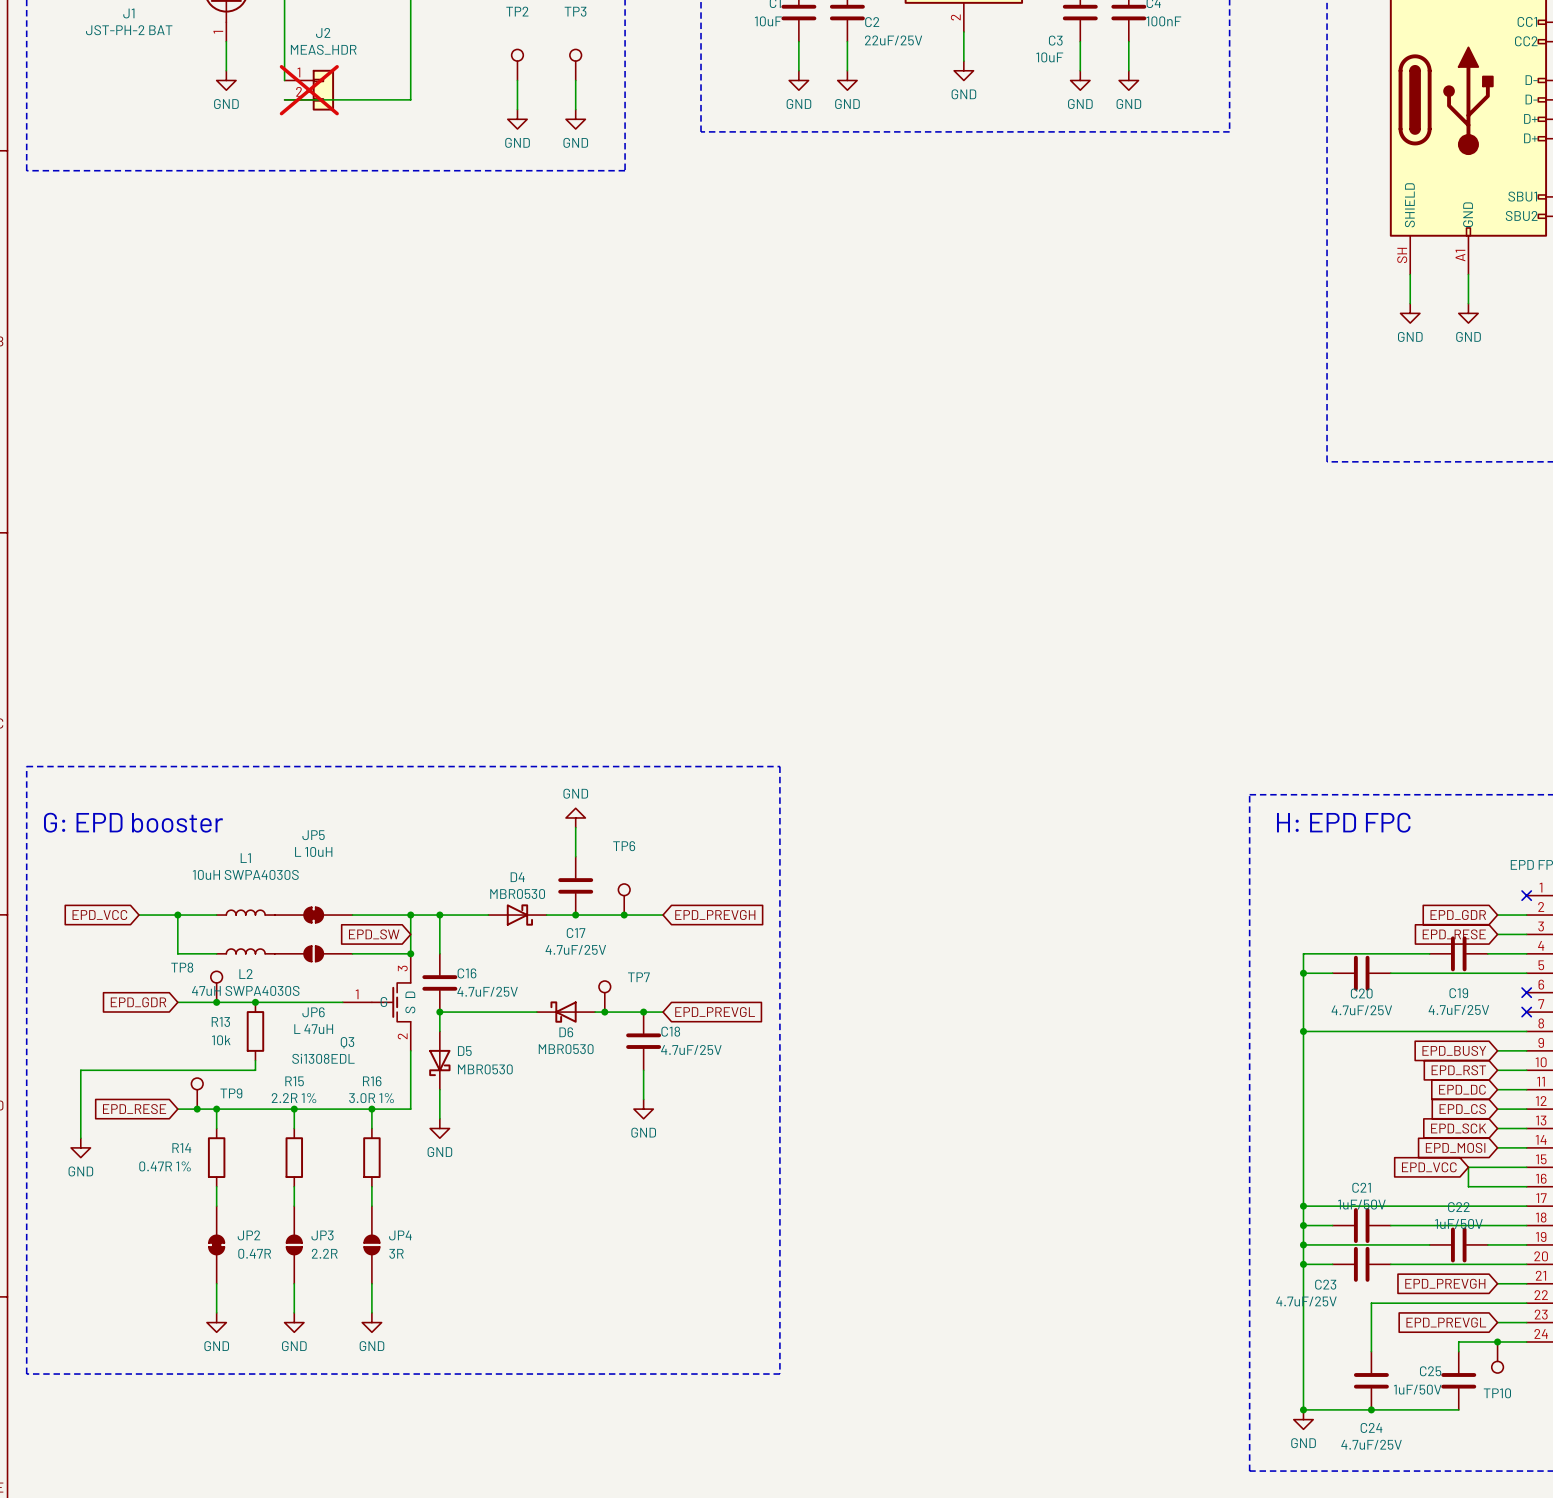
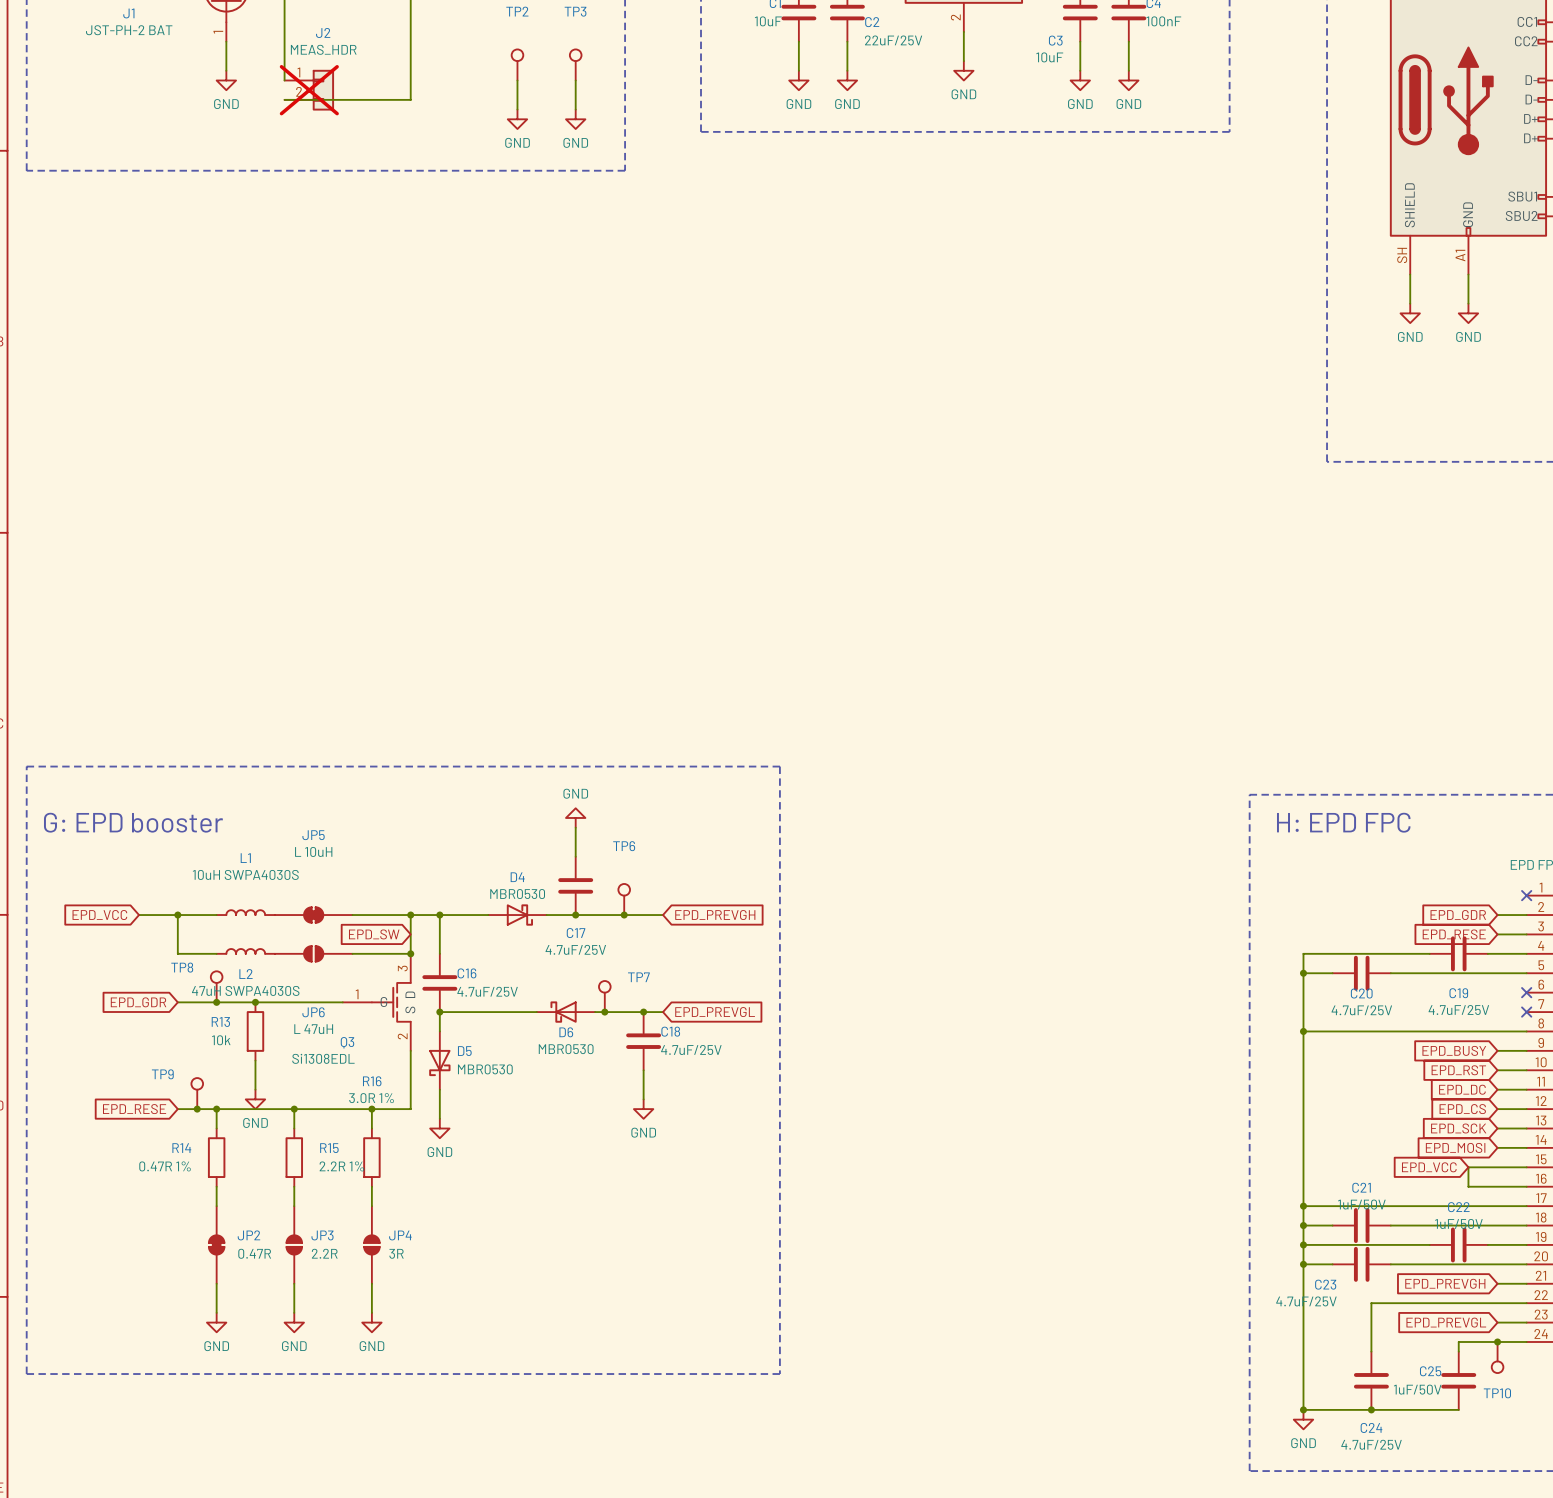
wire: (255, 1070) (80, 1070) (80, 1138) -> (255, 1070) (255, 1089)
R15 name position: R15 (294, 1081) -> R15 (329, 1148)
TP9 name position: TP9 (231, 1093) -> TP9 (162, 1074)
R15 value position: 2.2R 1% (294, 1098) -> 2.2R 1% (341, 1166)
power symbol position: GND (80, 1147) -> GND (255, 1099)

